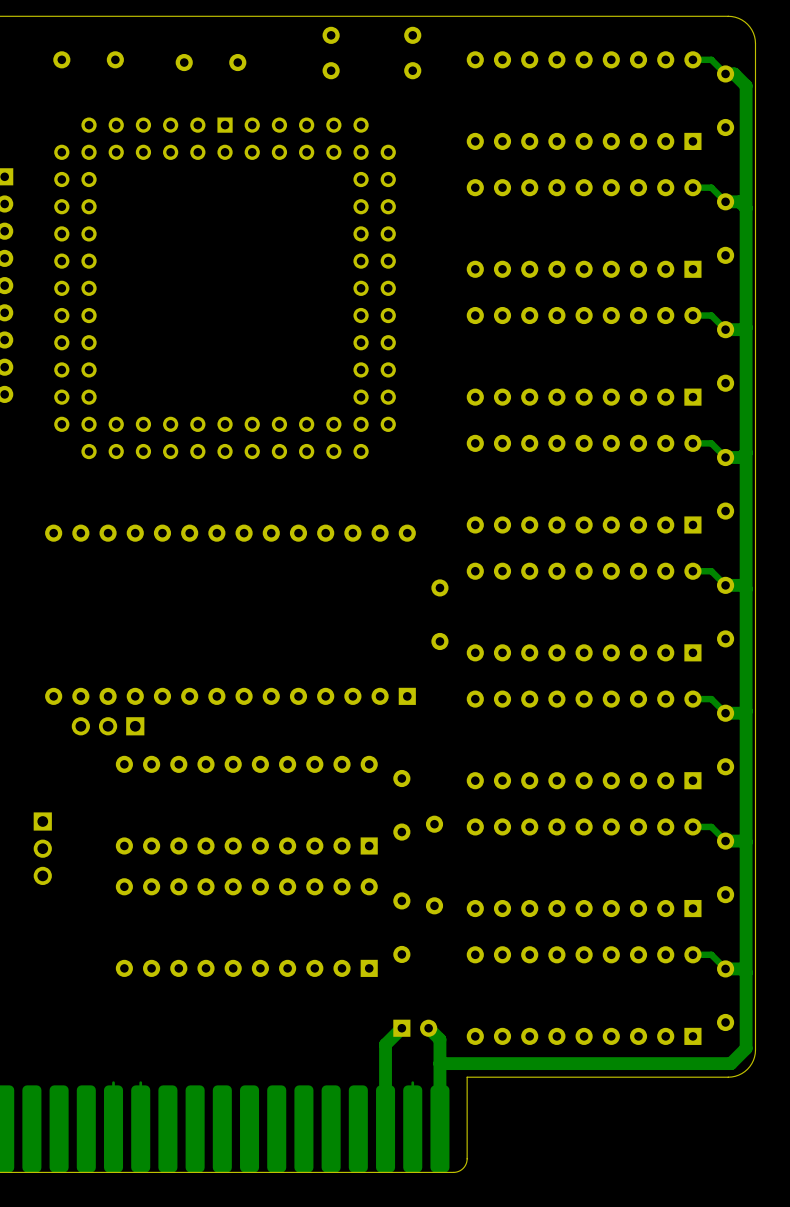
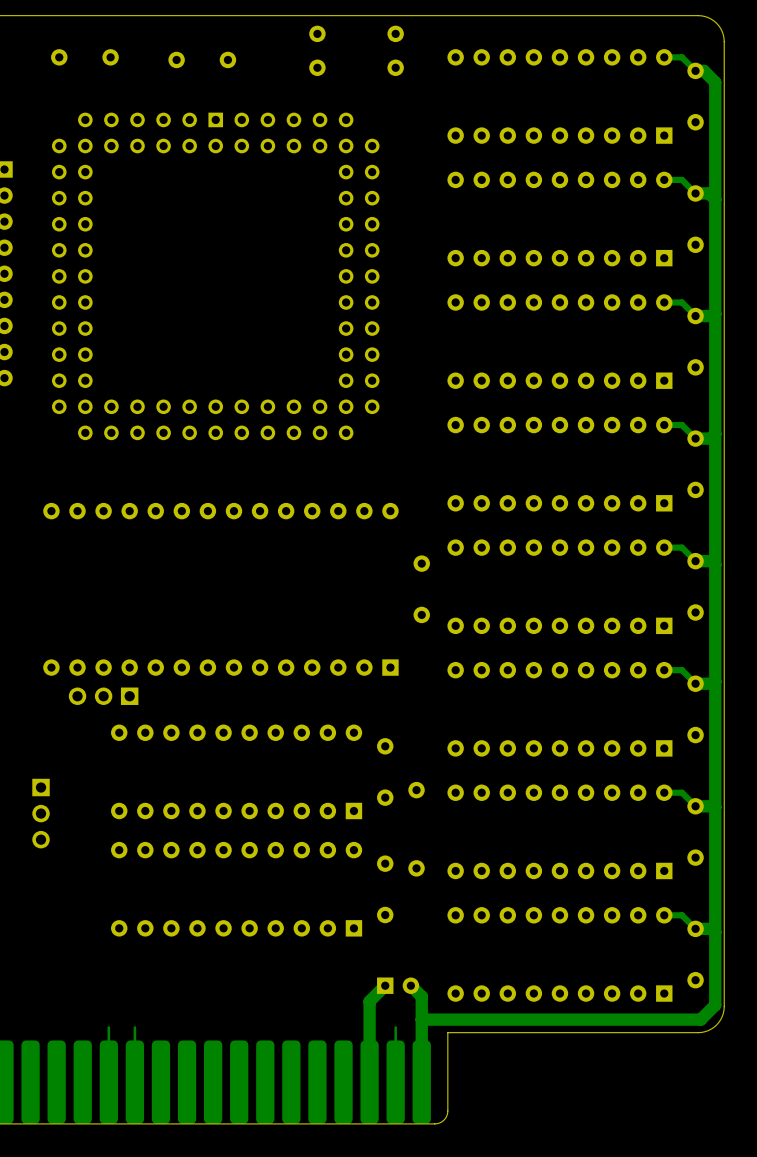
track: none -> (108, 1027) (108, 1037)
track: none -> (134, 1027) (134, 1037)
track: none -> (395, 1027) (395, 1037)

